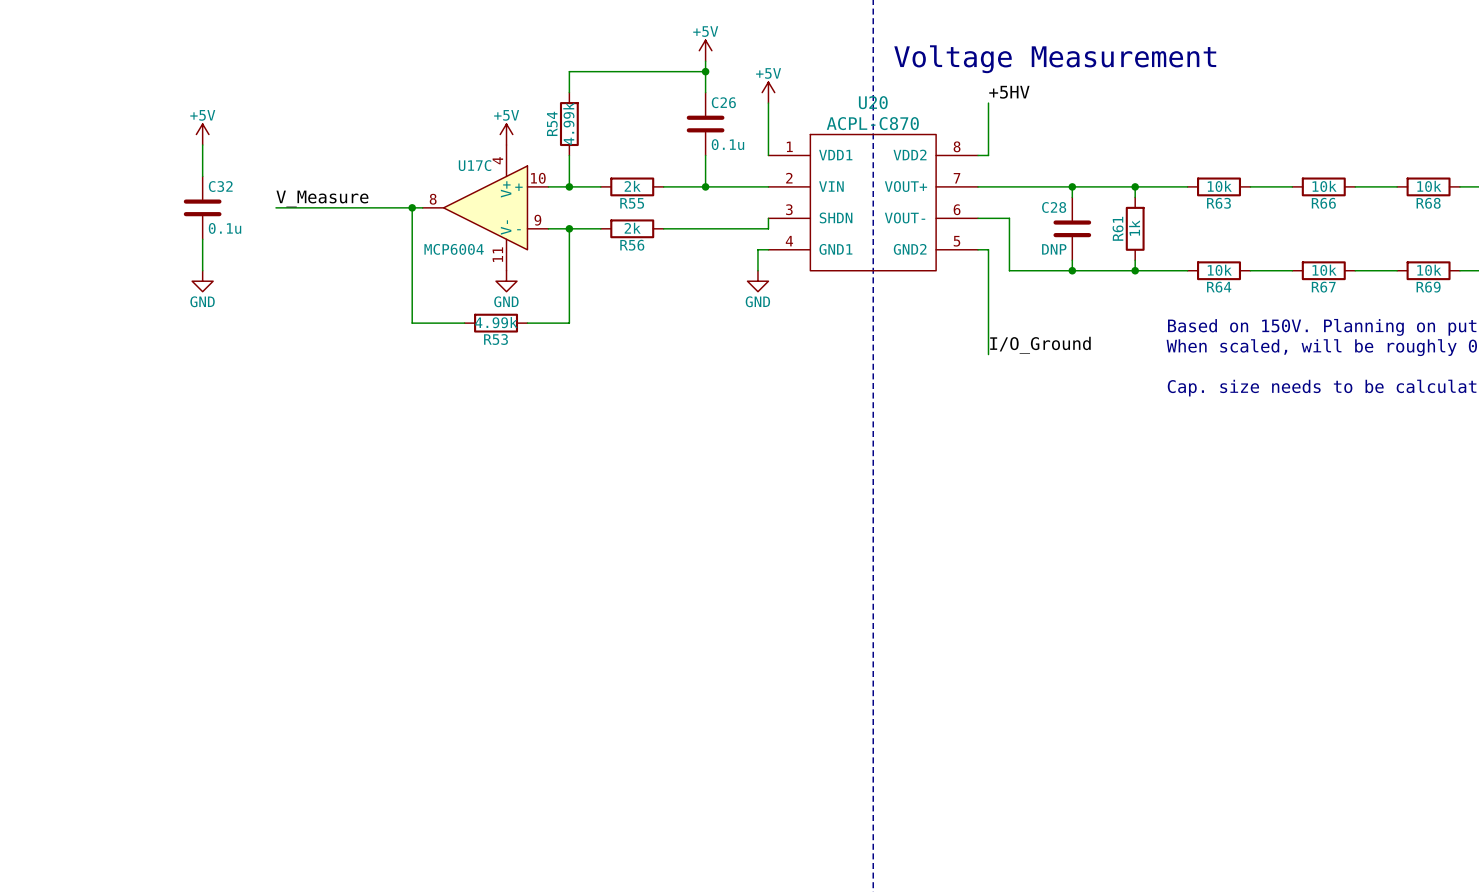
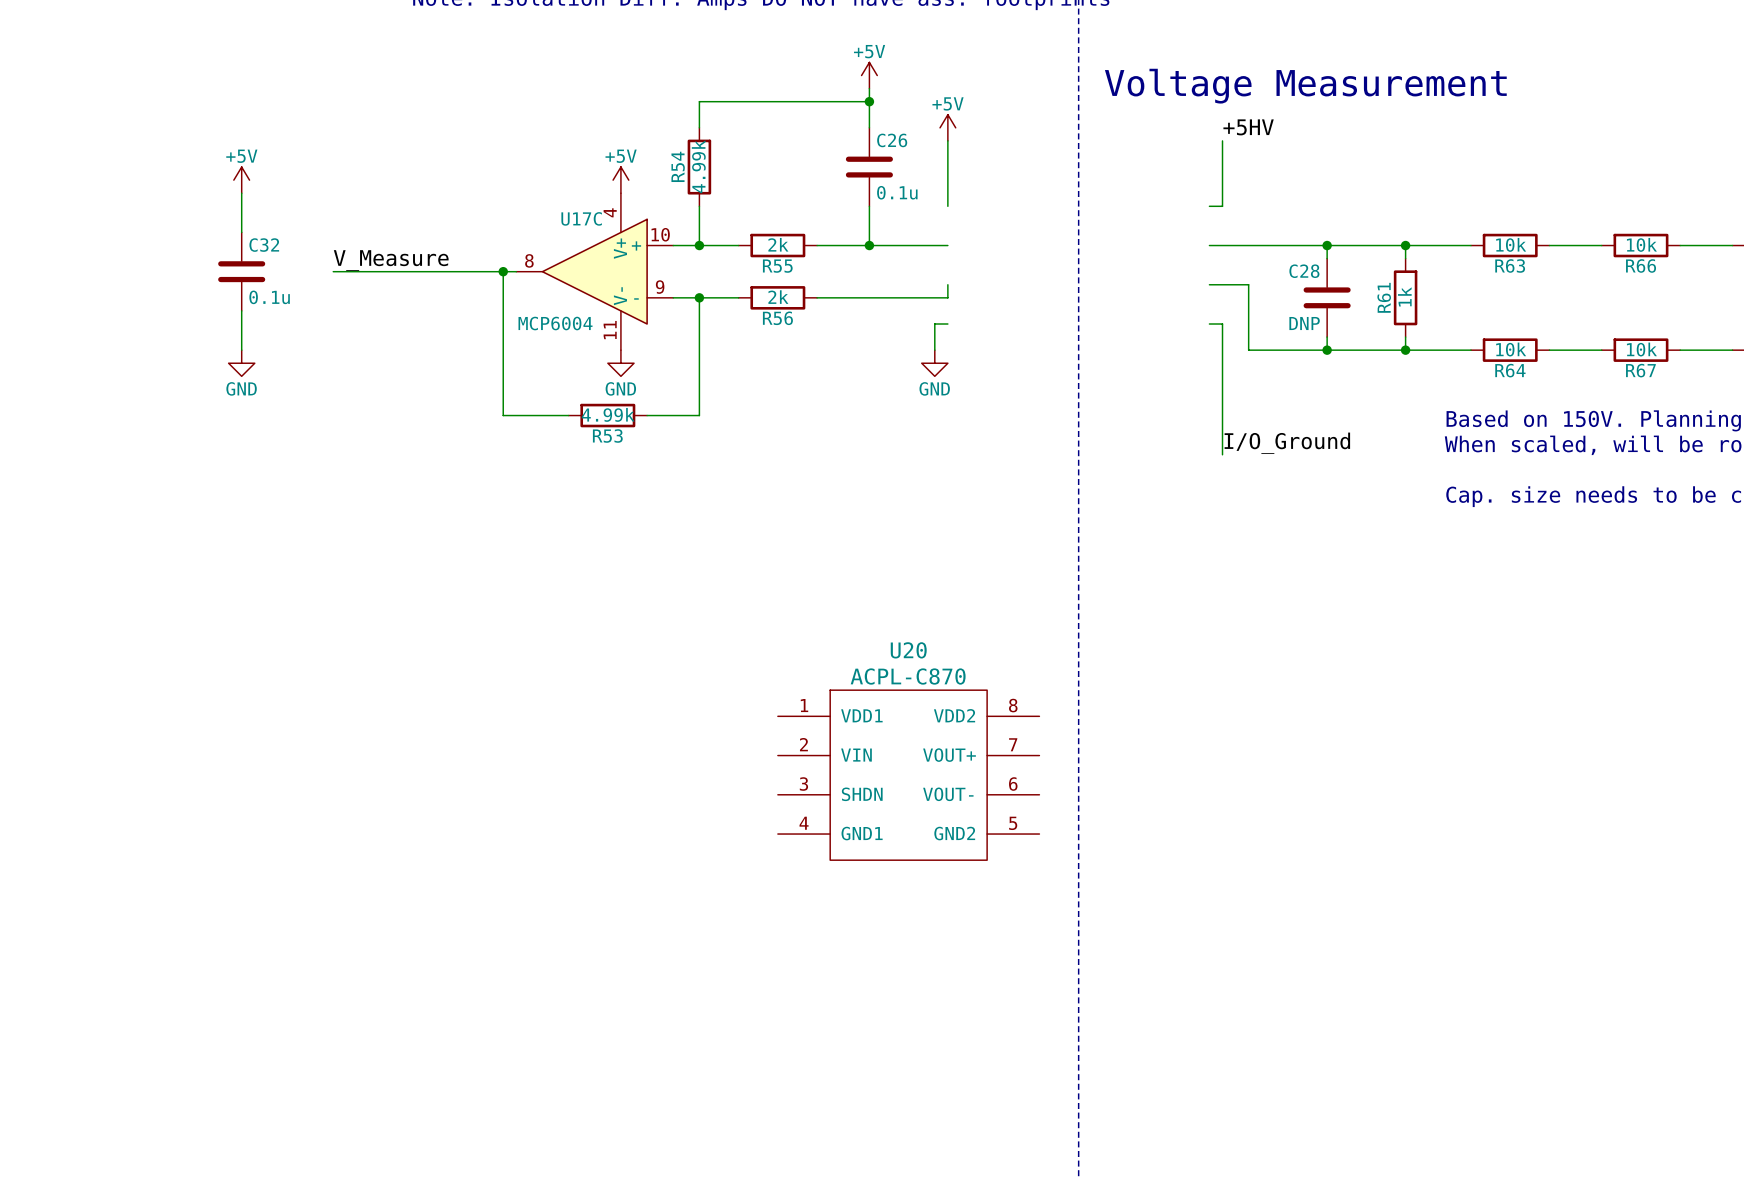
U20 position: (873, 202) -> (908, 775)

